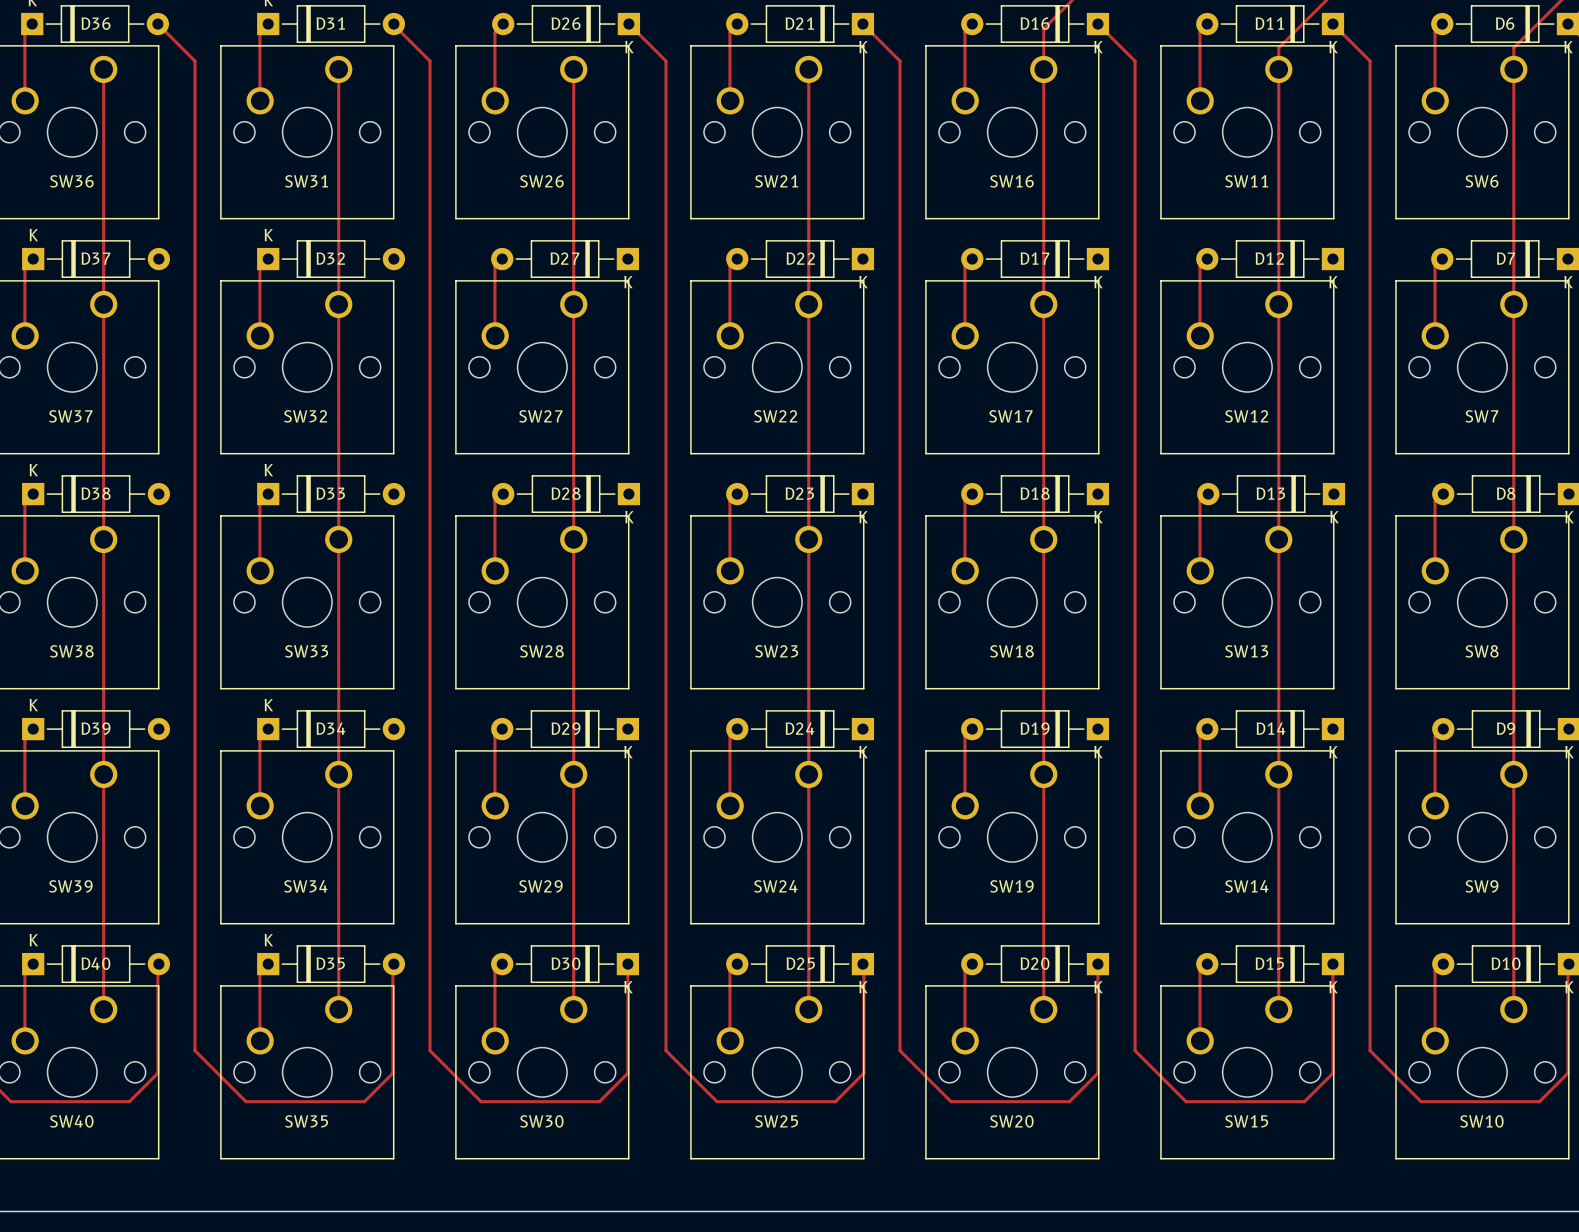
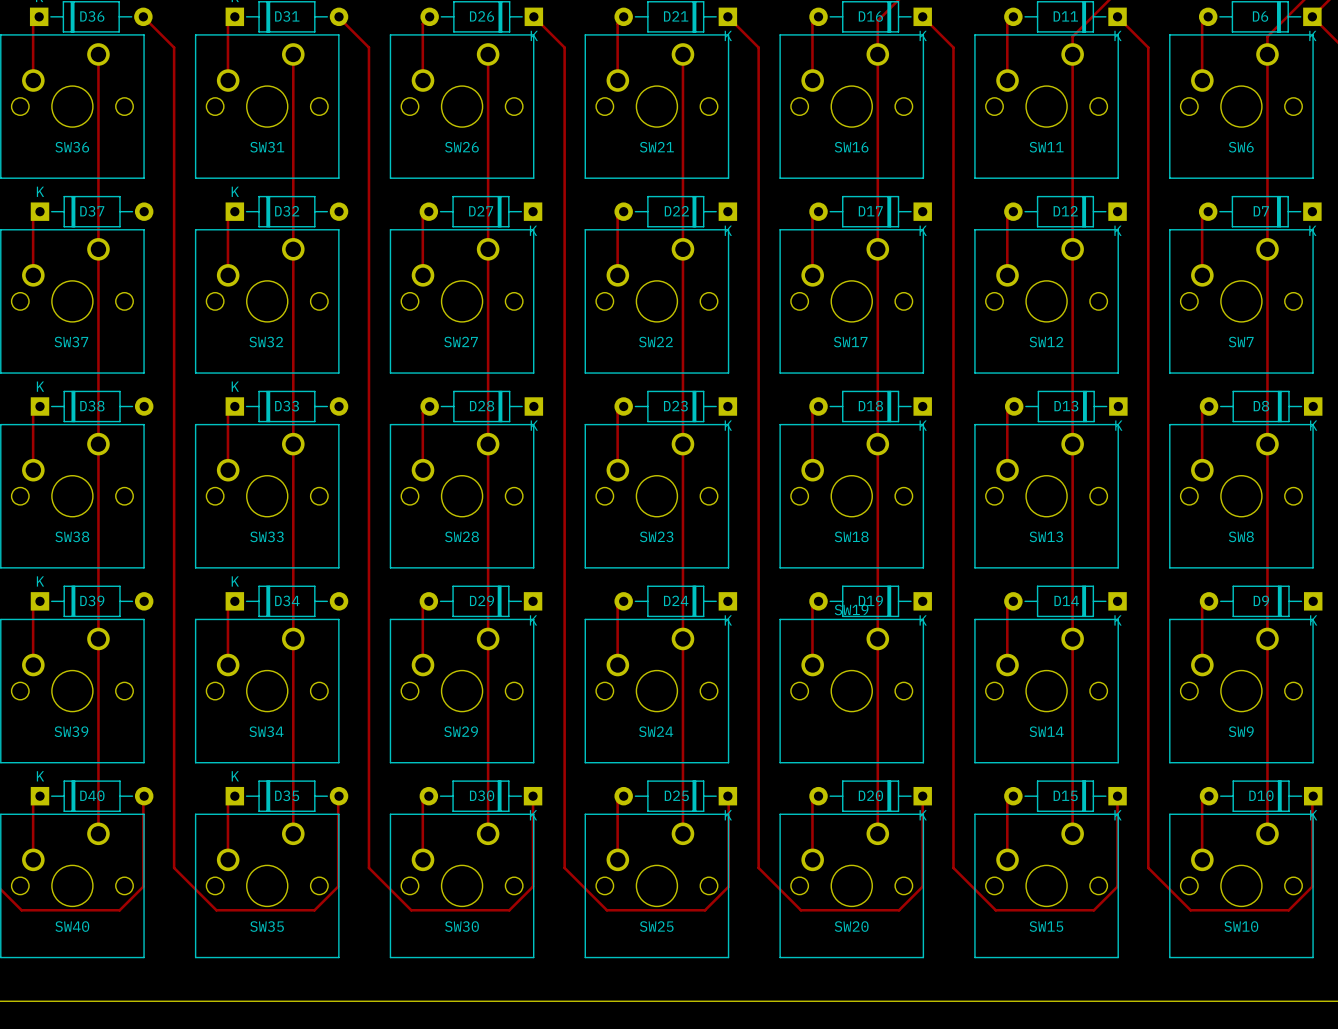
SW19 name position: SW19 (1011, 886) -> SW19 (851, 609)

